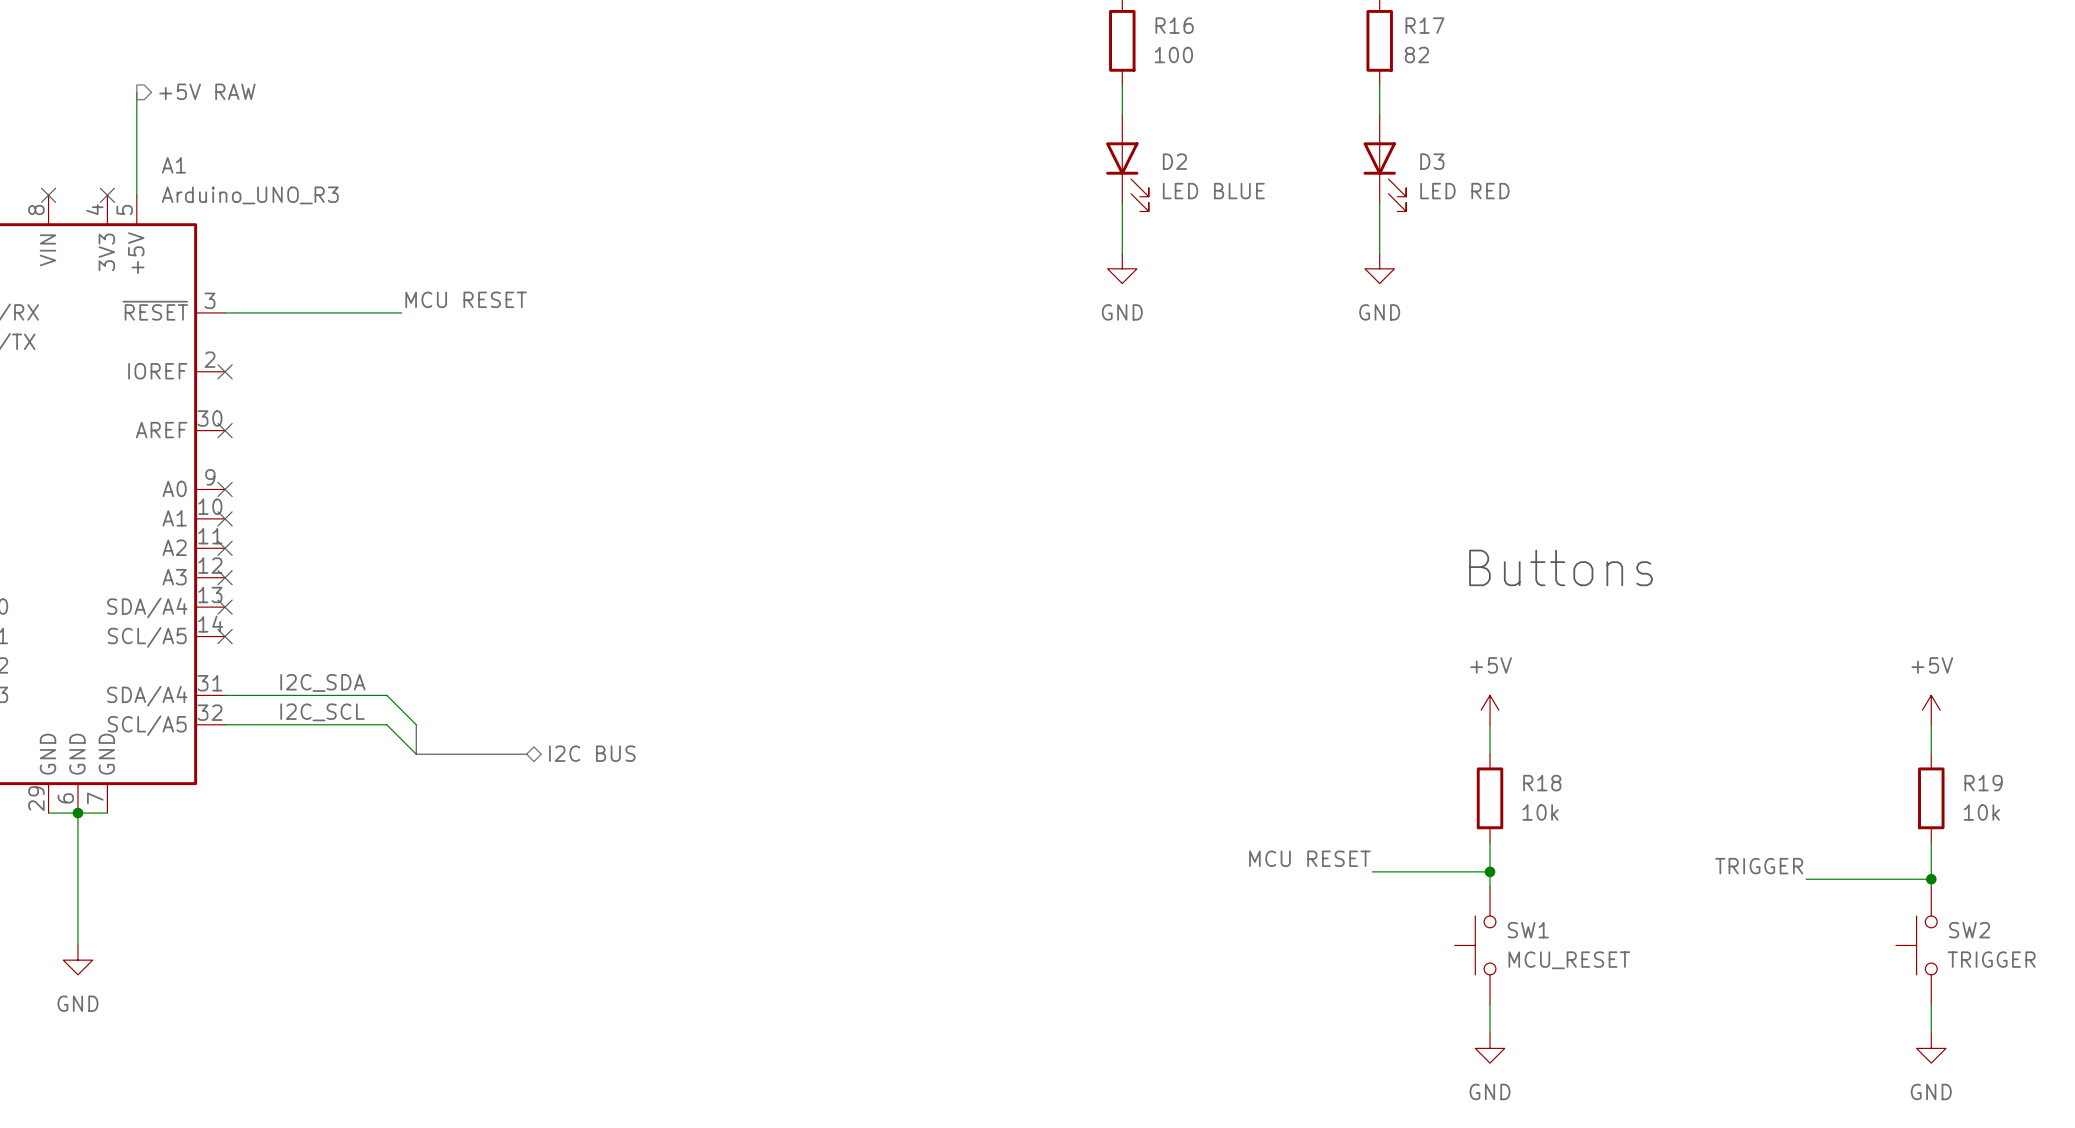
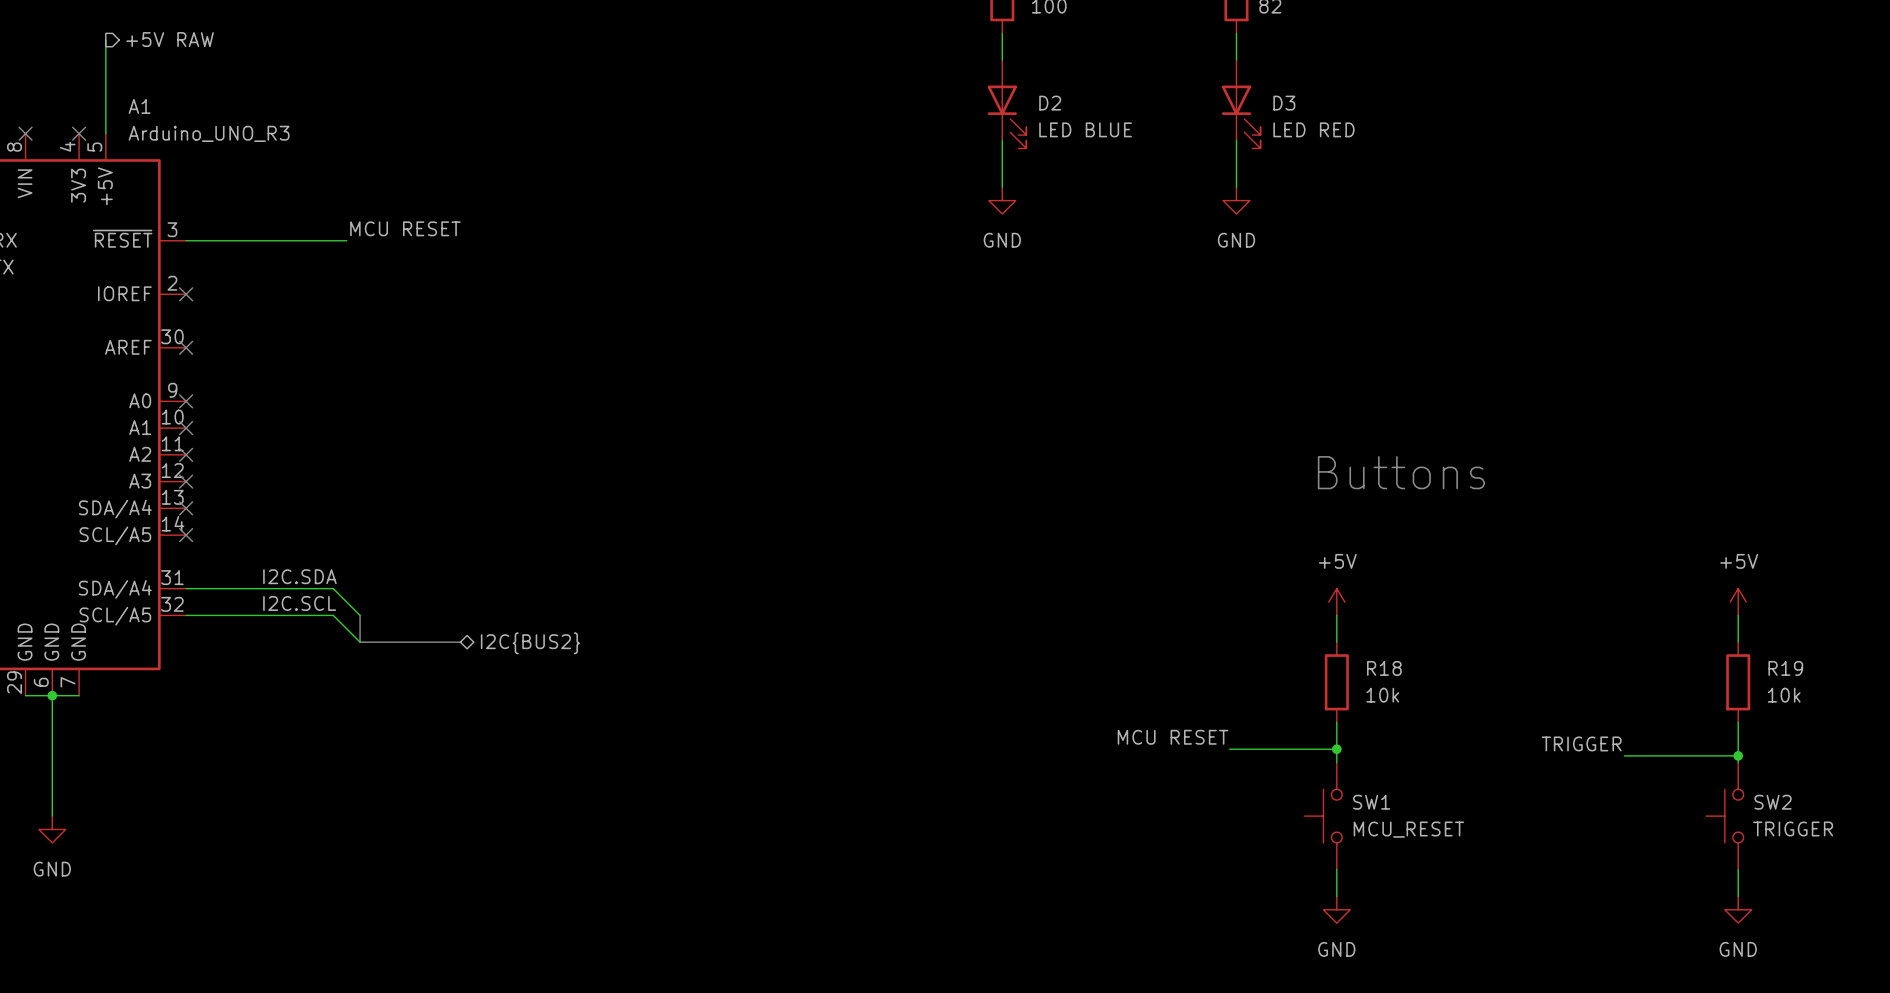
label: I2C_SDA (322, 682) -> I2C.SDA (299, 576)
label: I2C_SCL (322, 712) -> I2C.SCL (299, 603)
hierarchical label: I2C BUS (592, 753) -> I2C{BUS2} (530, 643)

